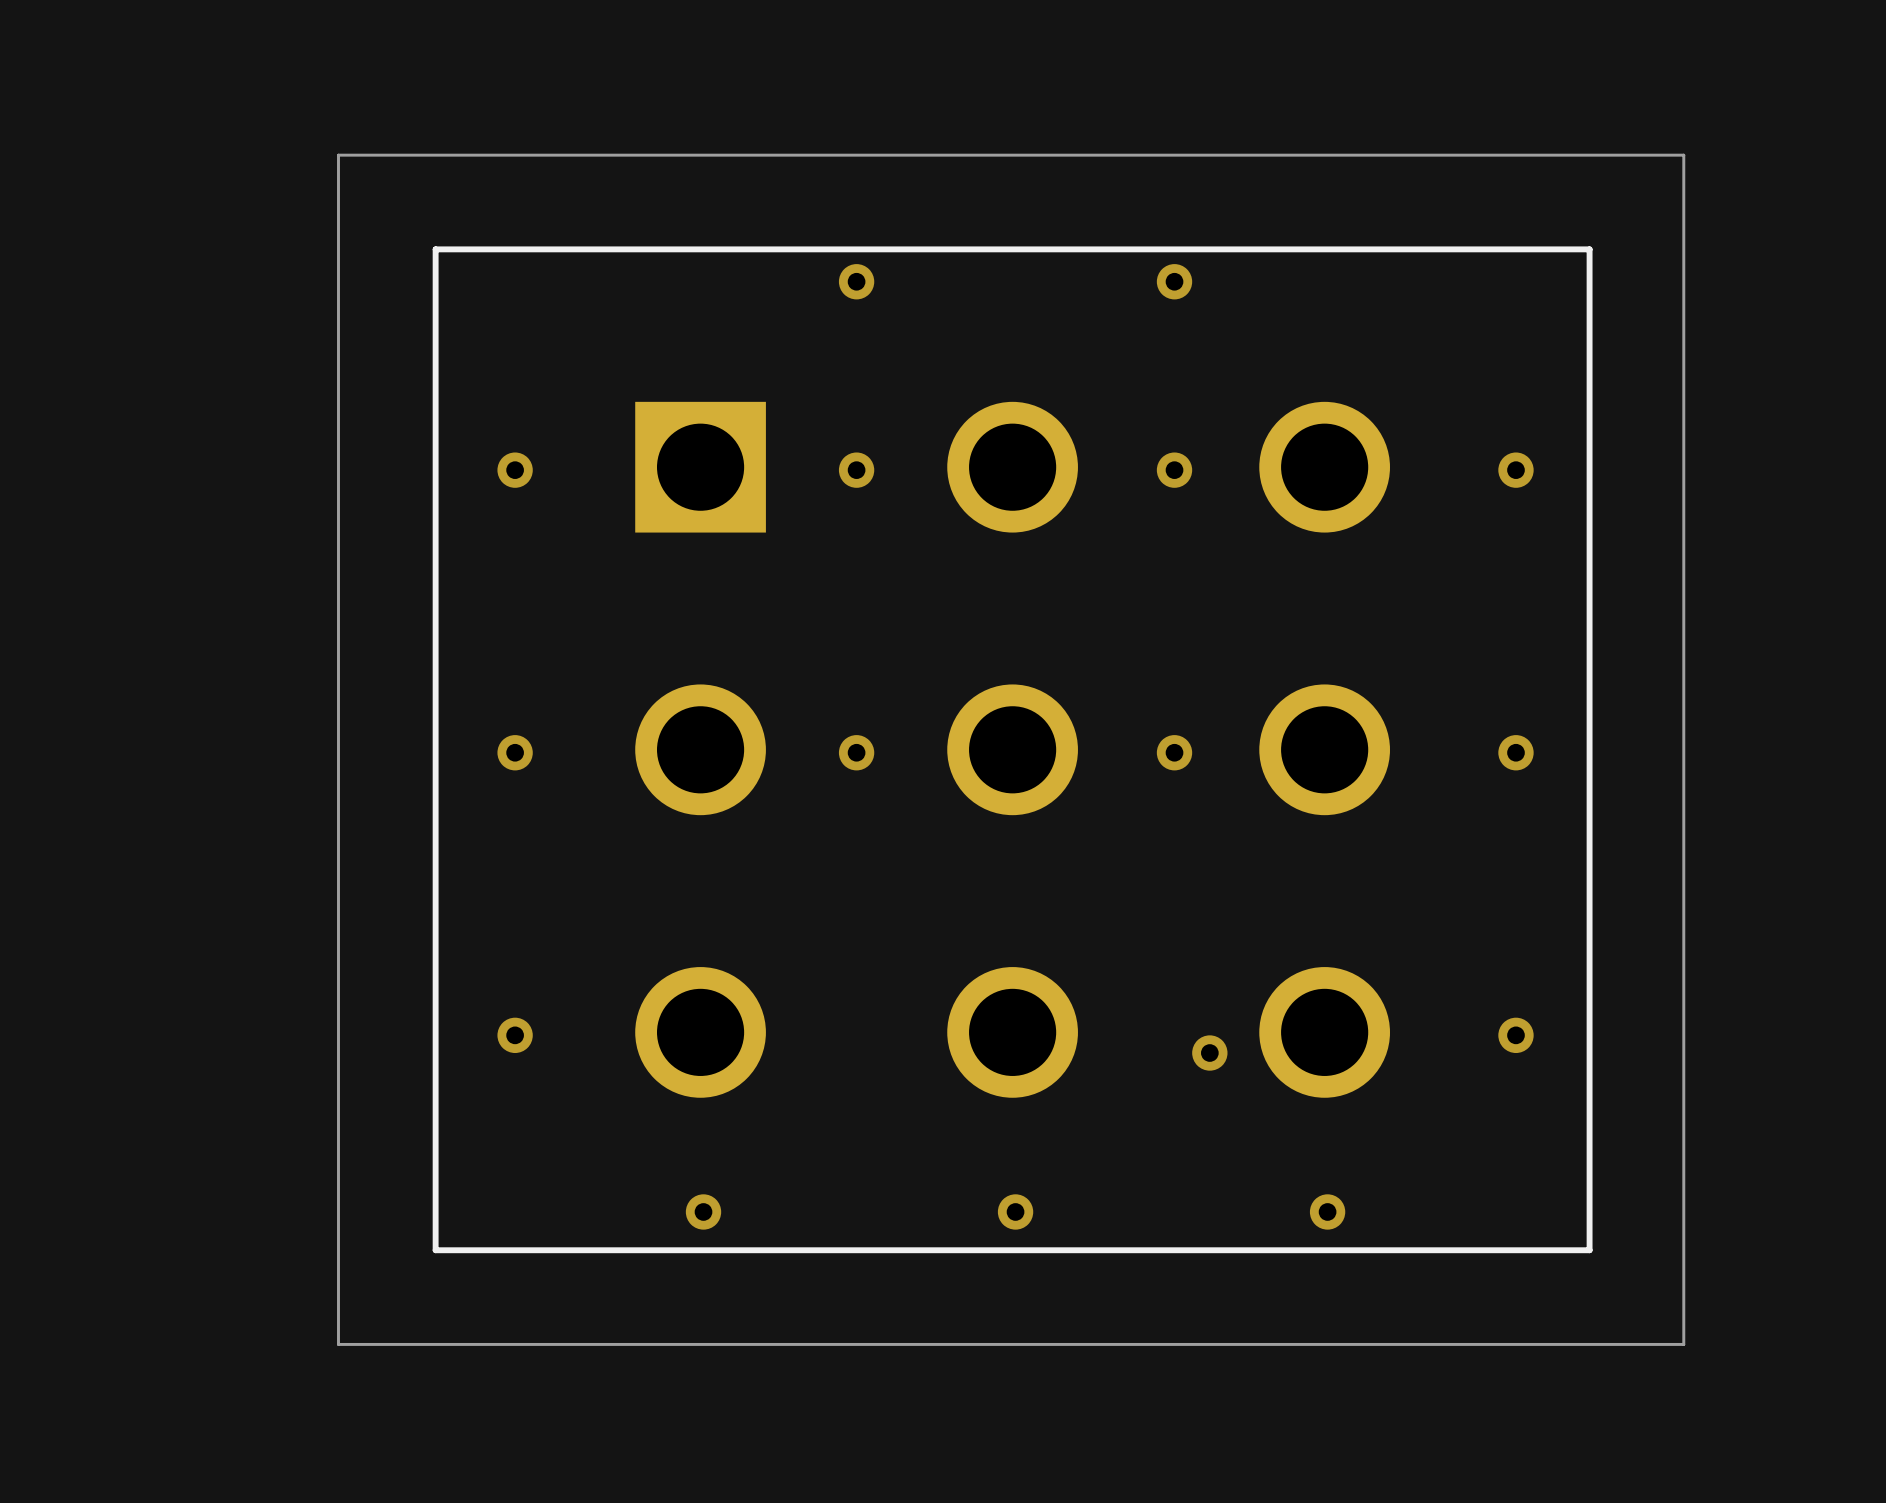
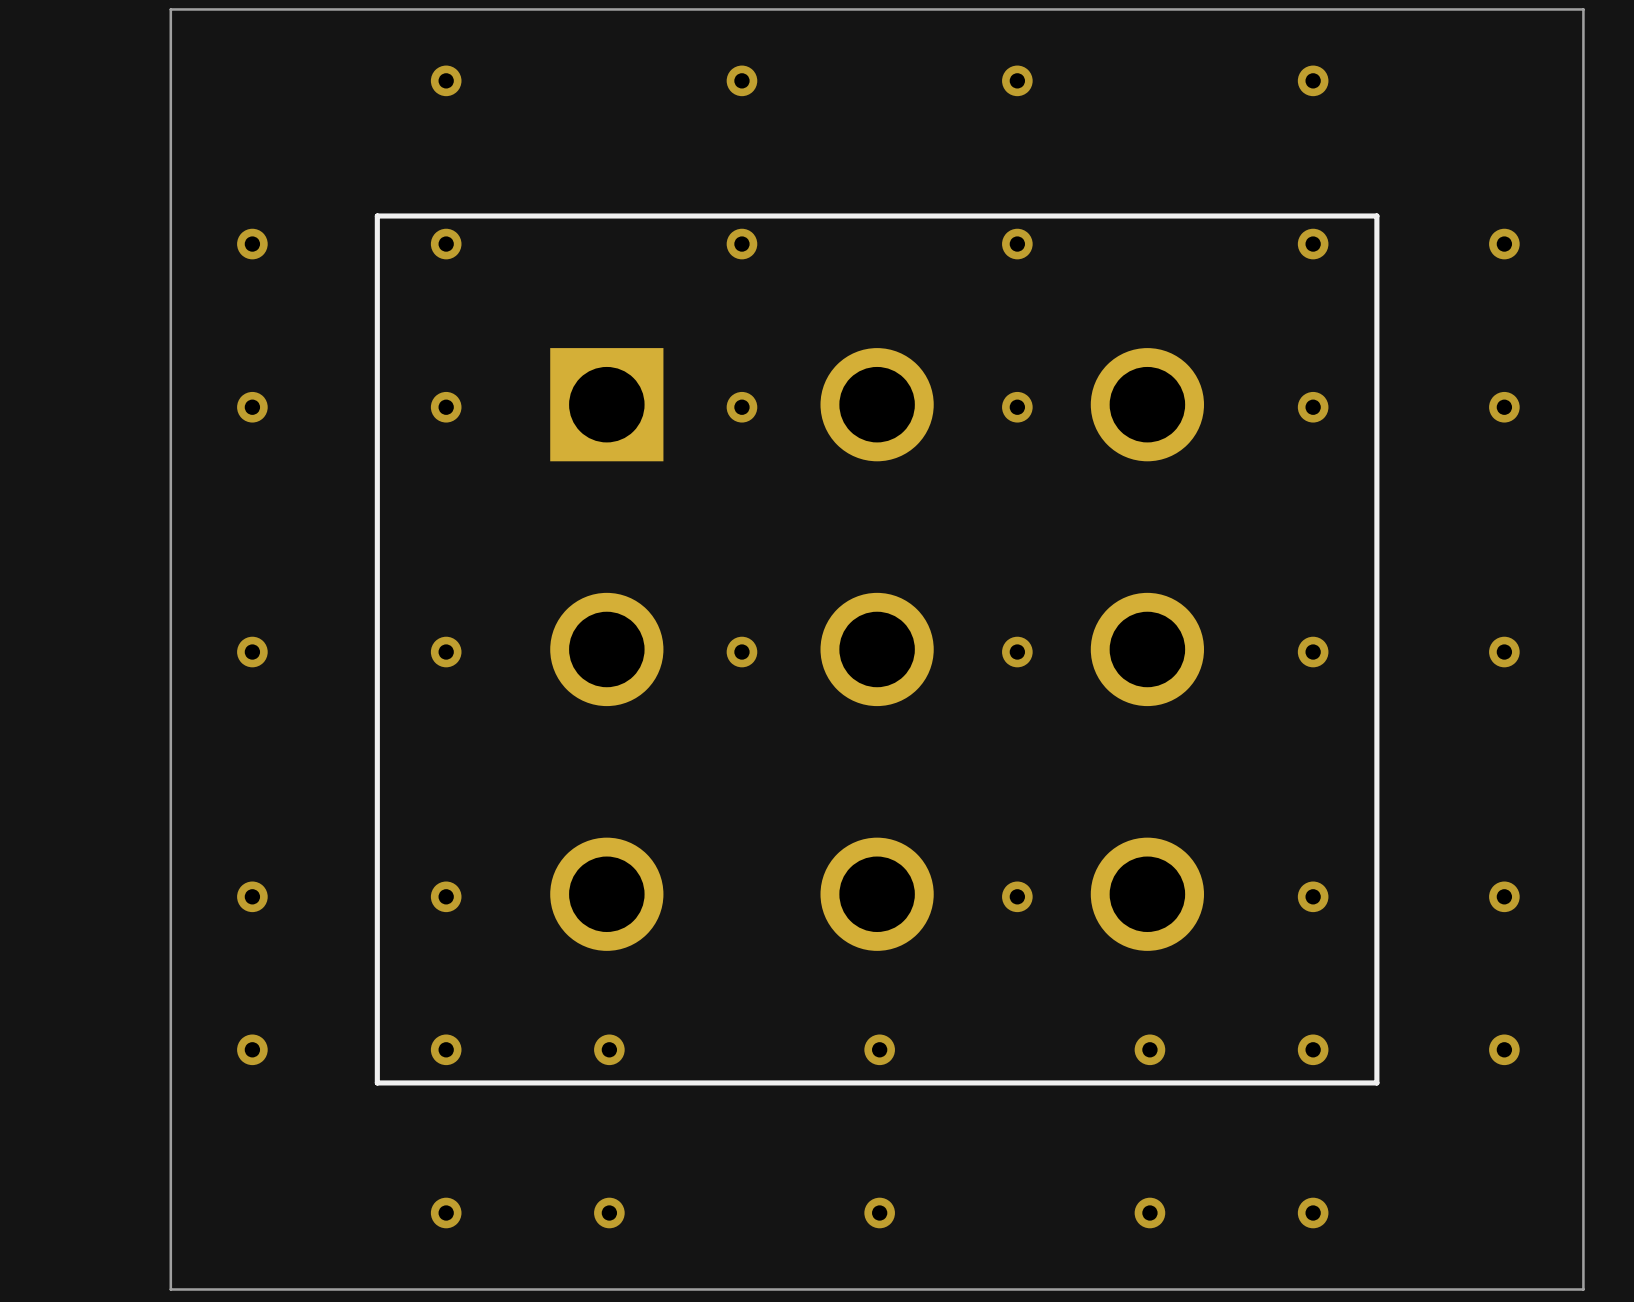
via: none -> (446, 80)
via: none -> (741, 80)
via: none -> (1017, 80)
via: none -> (1313, 80)
board edge: (338, 155) (338, 1344) (1683, 1344) (1683, 155) (338, 155) -> (170, 9) (170, 1289) (1583, 1289) (1583, 9) (170, 9)
via: none -> (252, 244)
via: none -> (446, 244)
via: none -> (1313, 244)
via: none -> (1504, 244)
via: none -> (252, 407)
via: none -> (1504, 407)
via: none -> (252, 652)
via: none -> (1504, 652)
via: none -> (252, 896)
via: none -> (1504, 896)
via position: (1209, 1053) -> (1017, 896)
via: none -> (252, 1049)
via: none -> (446, 1049)
via: none -> (1313, 1049)
via: none -> (1504, 1049)
via: none -> (446, 1212)
via: none -> (609, 1212)
via: none -> (879, 1212)
via: none -> (1149, 1212)
via: none -> (1313, 1212)

